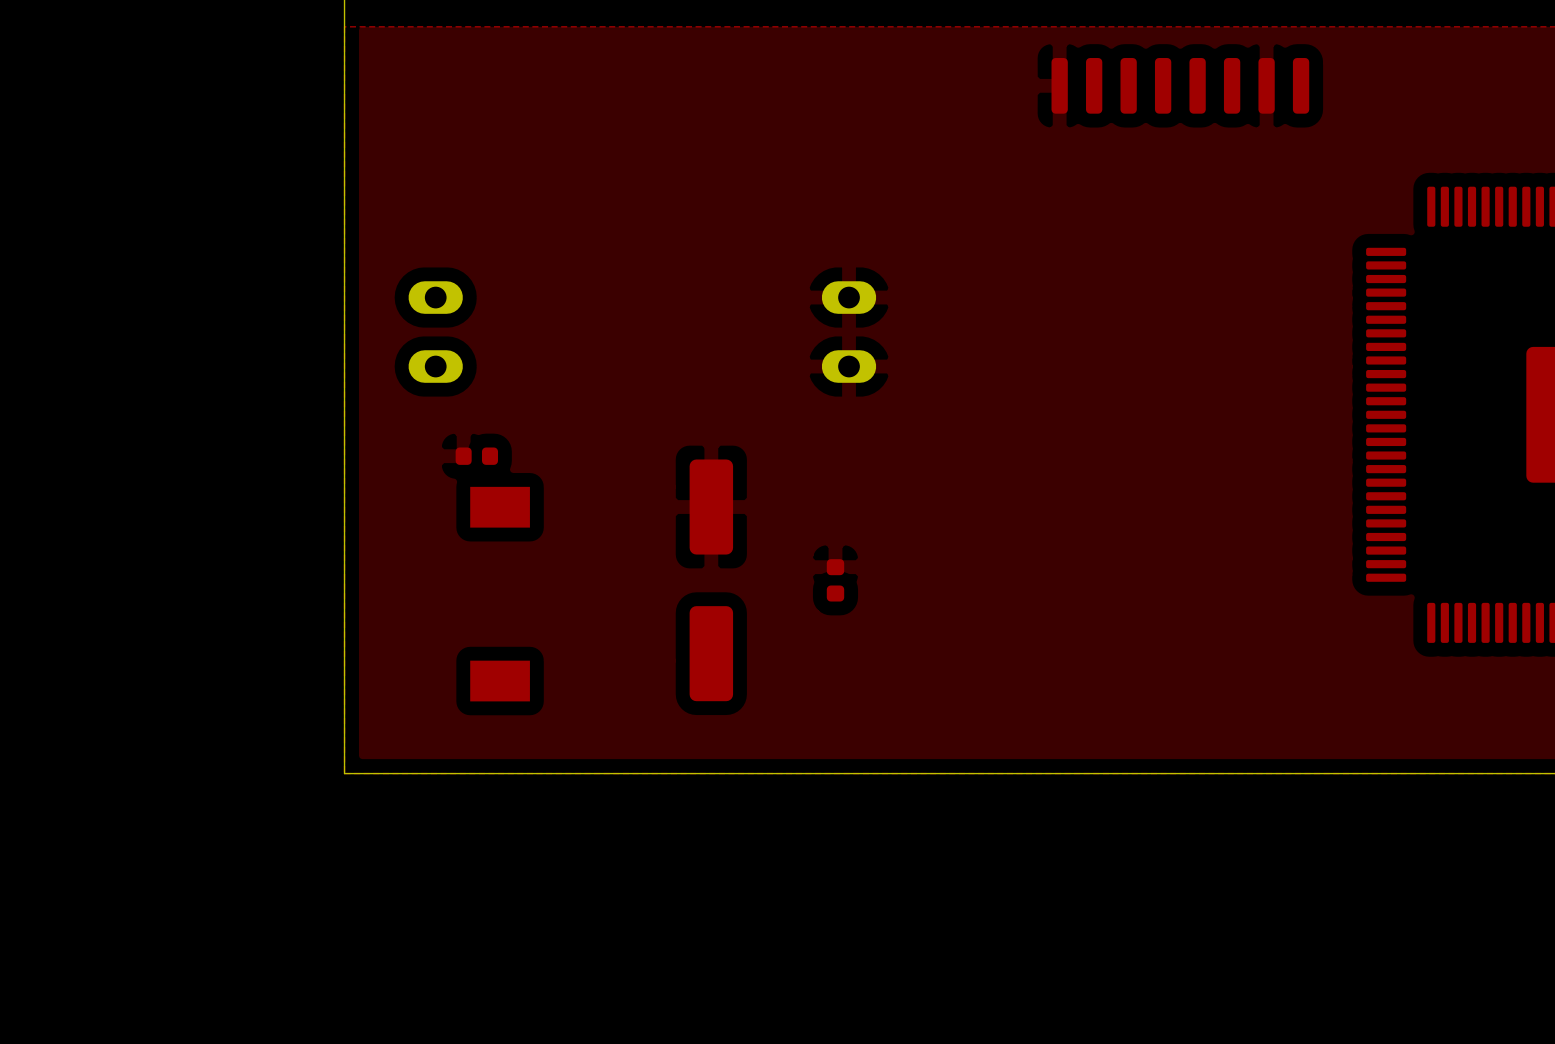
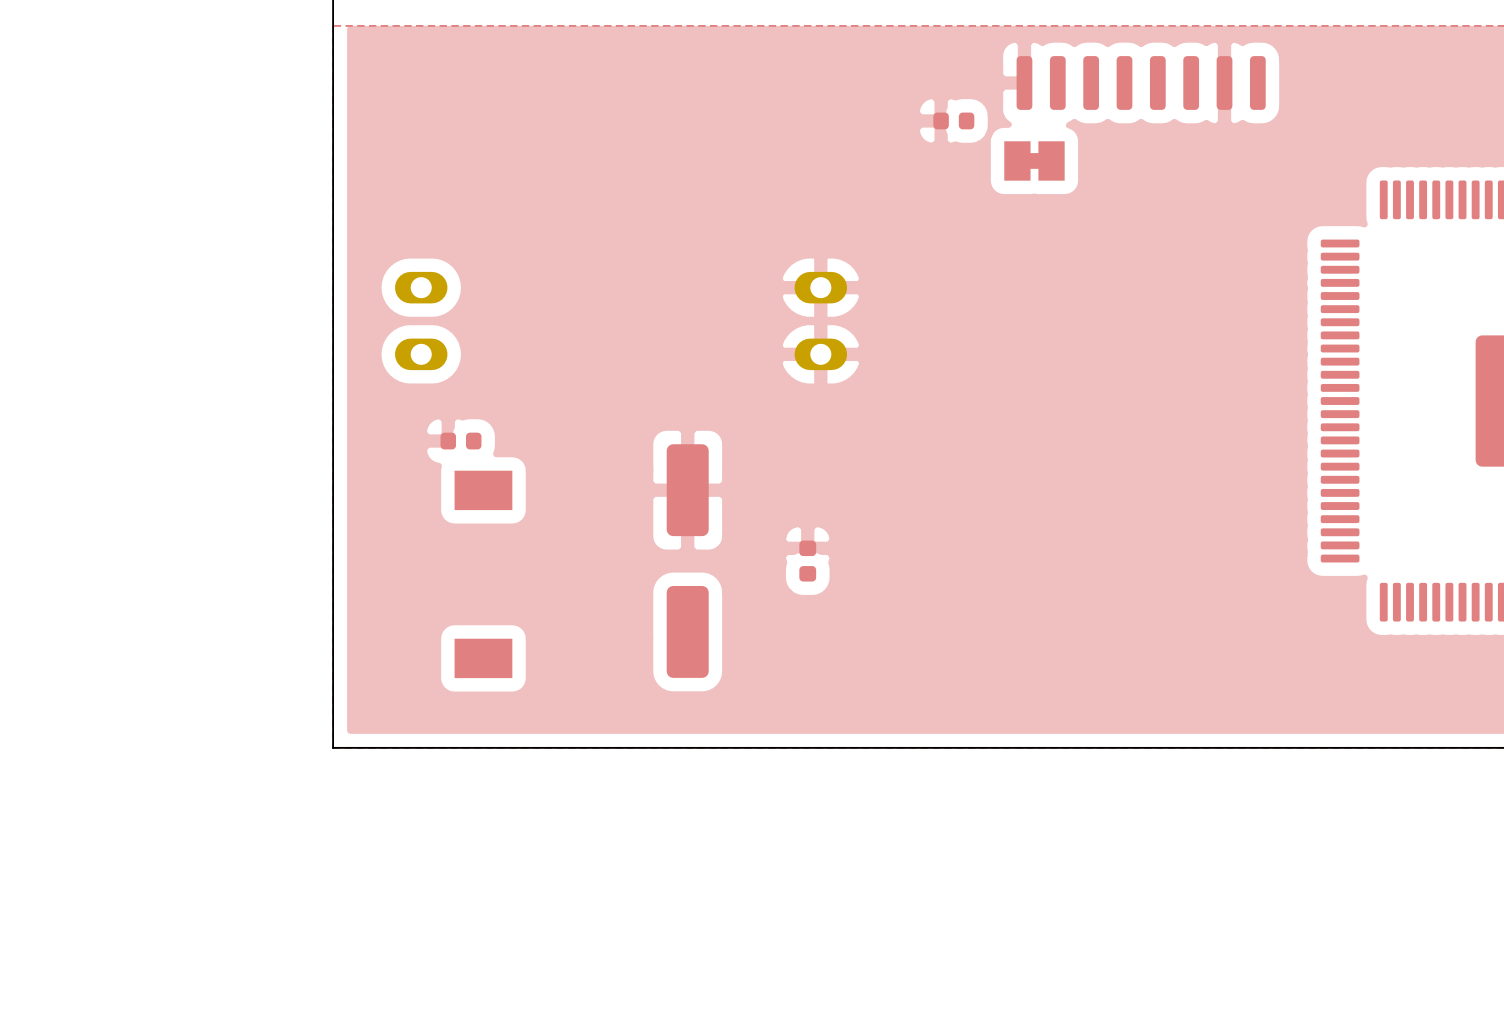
part: none -> (953, 120)
part: none -> (1034, 160)

